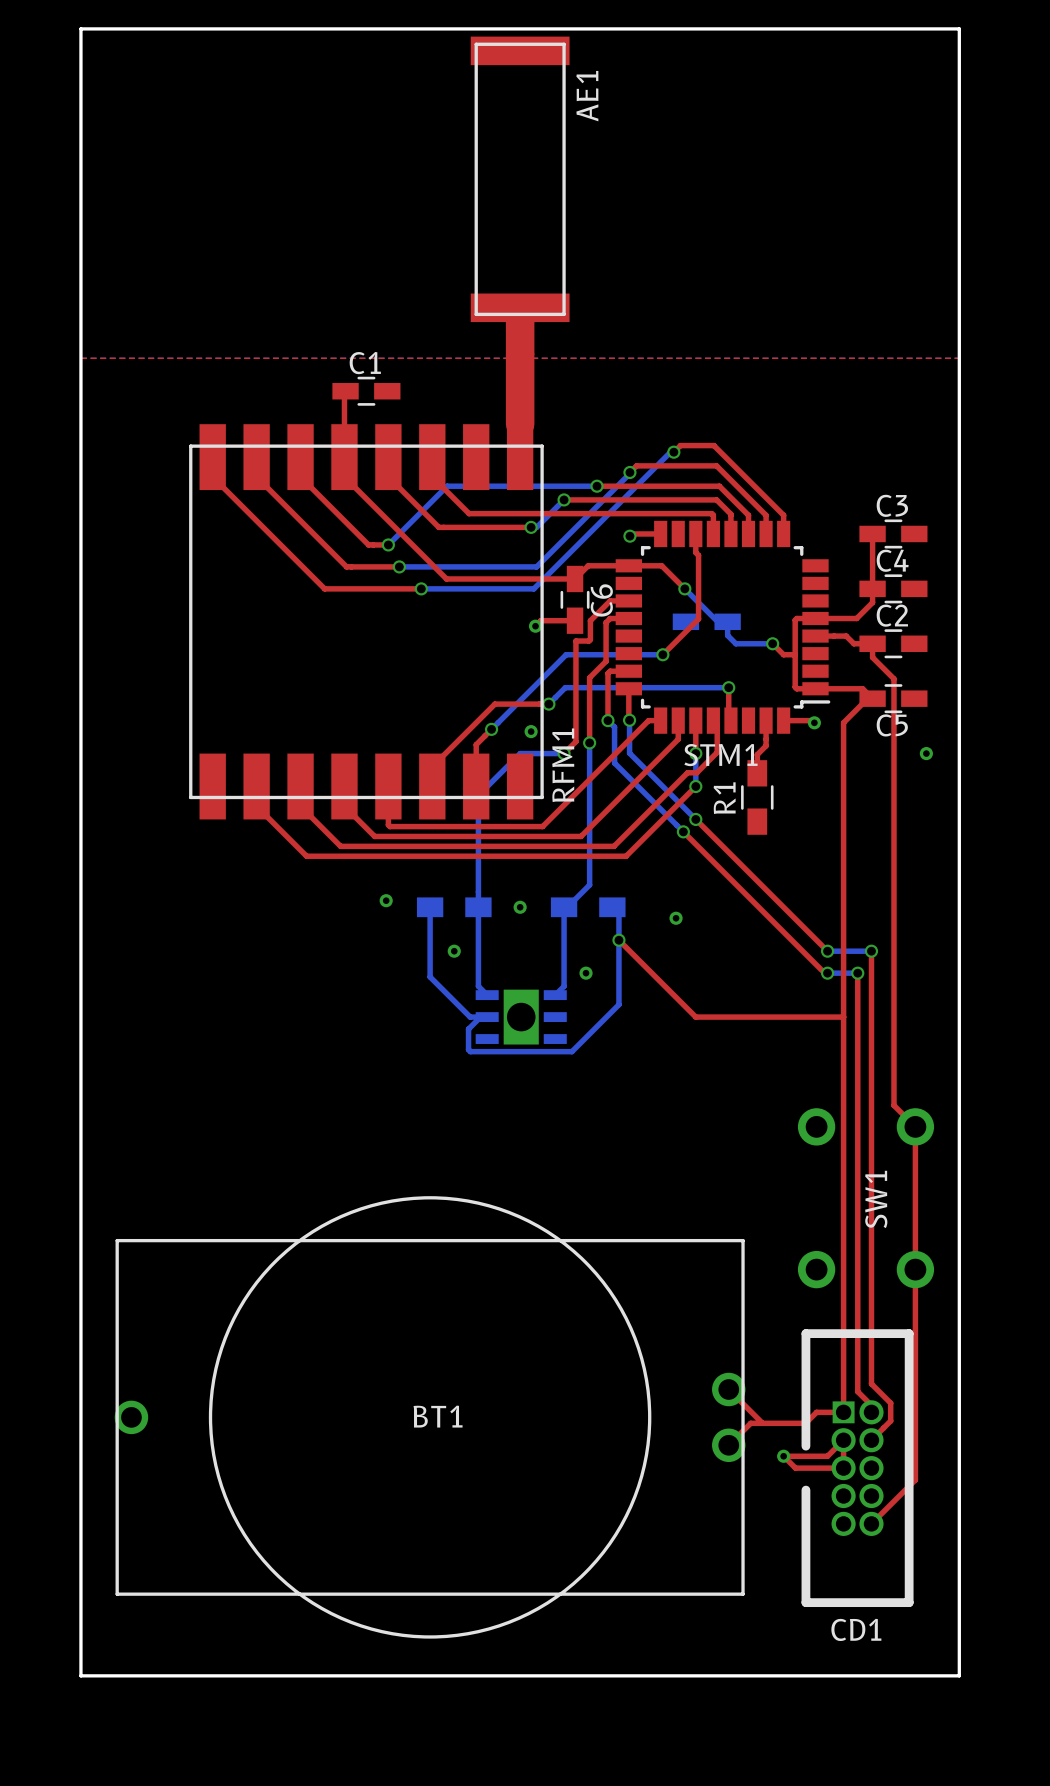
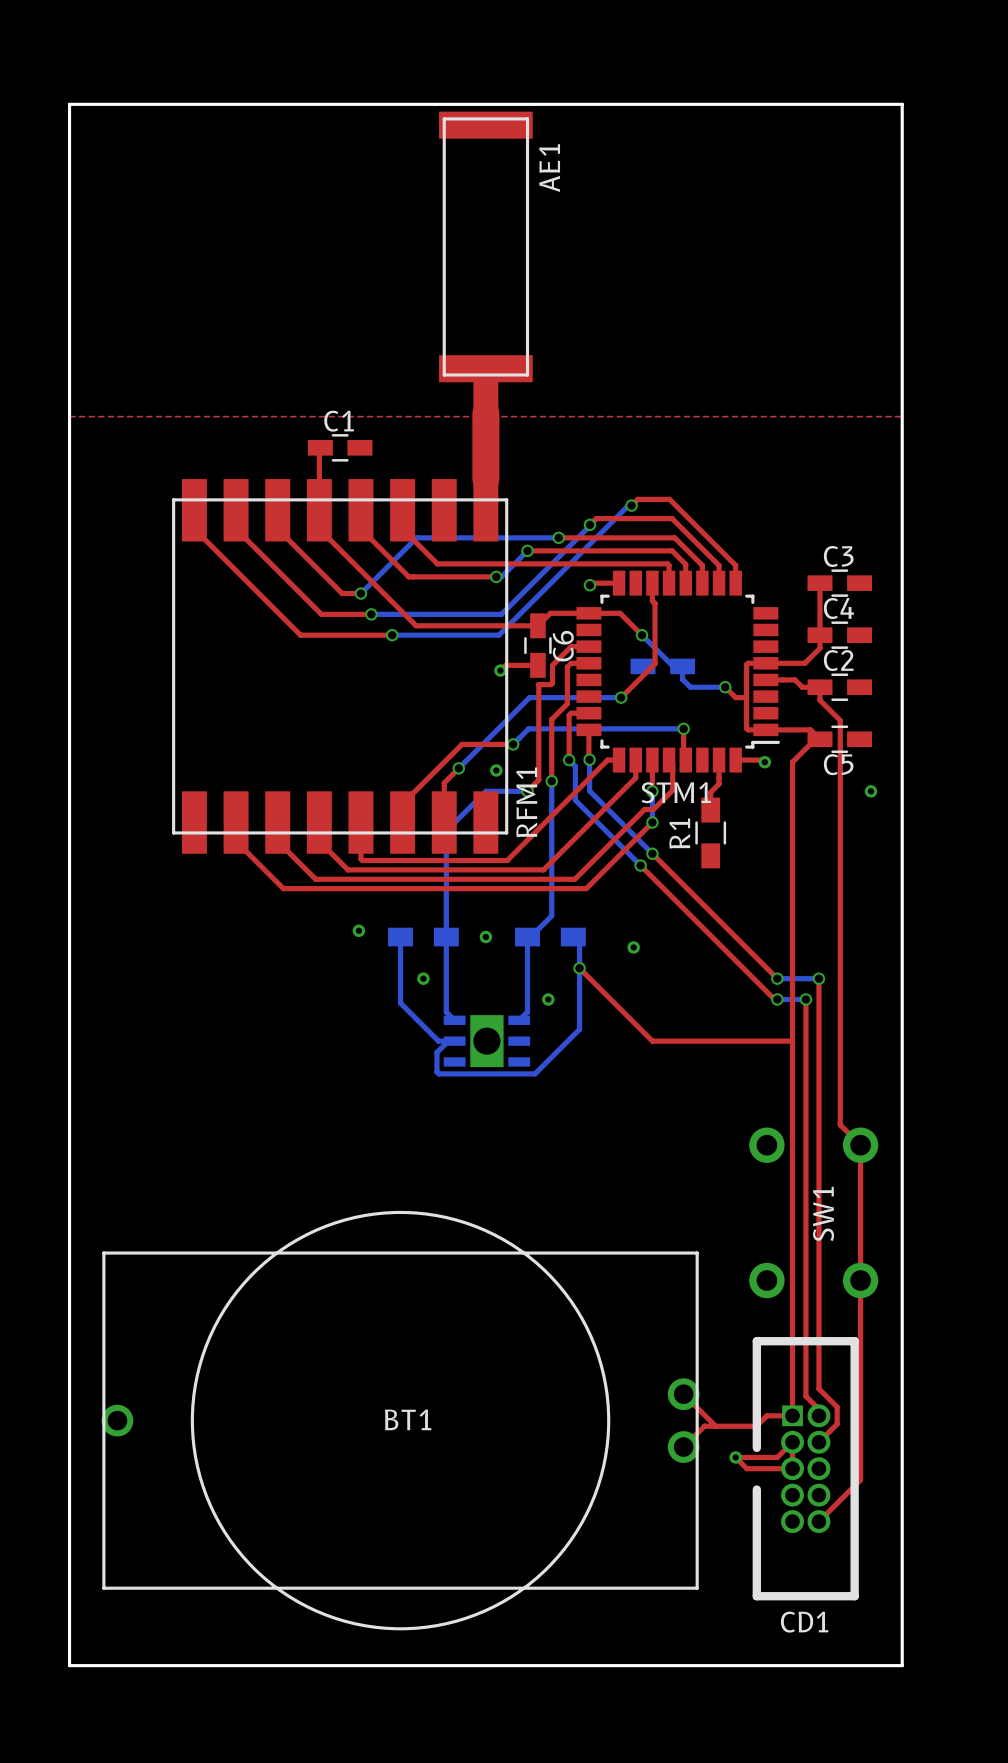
AE1 footprint: [470, 36, 570, 356] -> [439, 111, 533, 383]
top track: none -> (485, 382) (485, 413)

